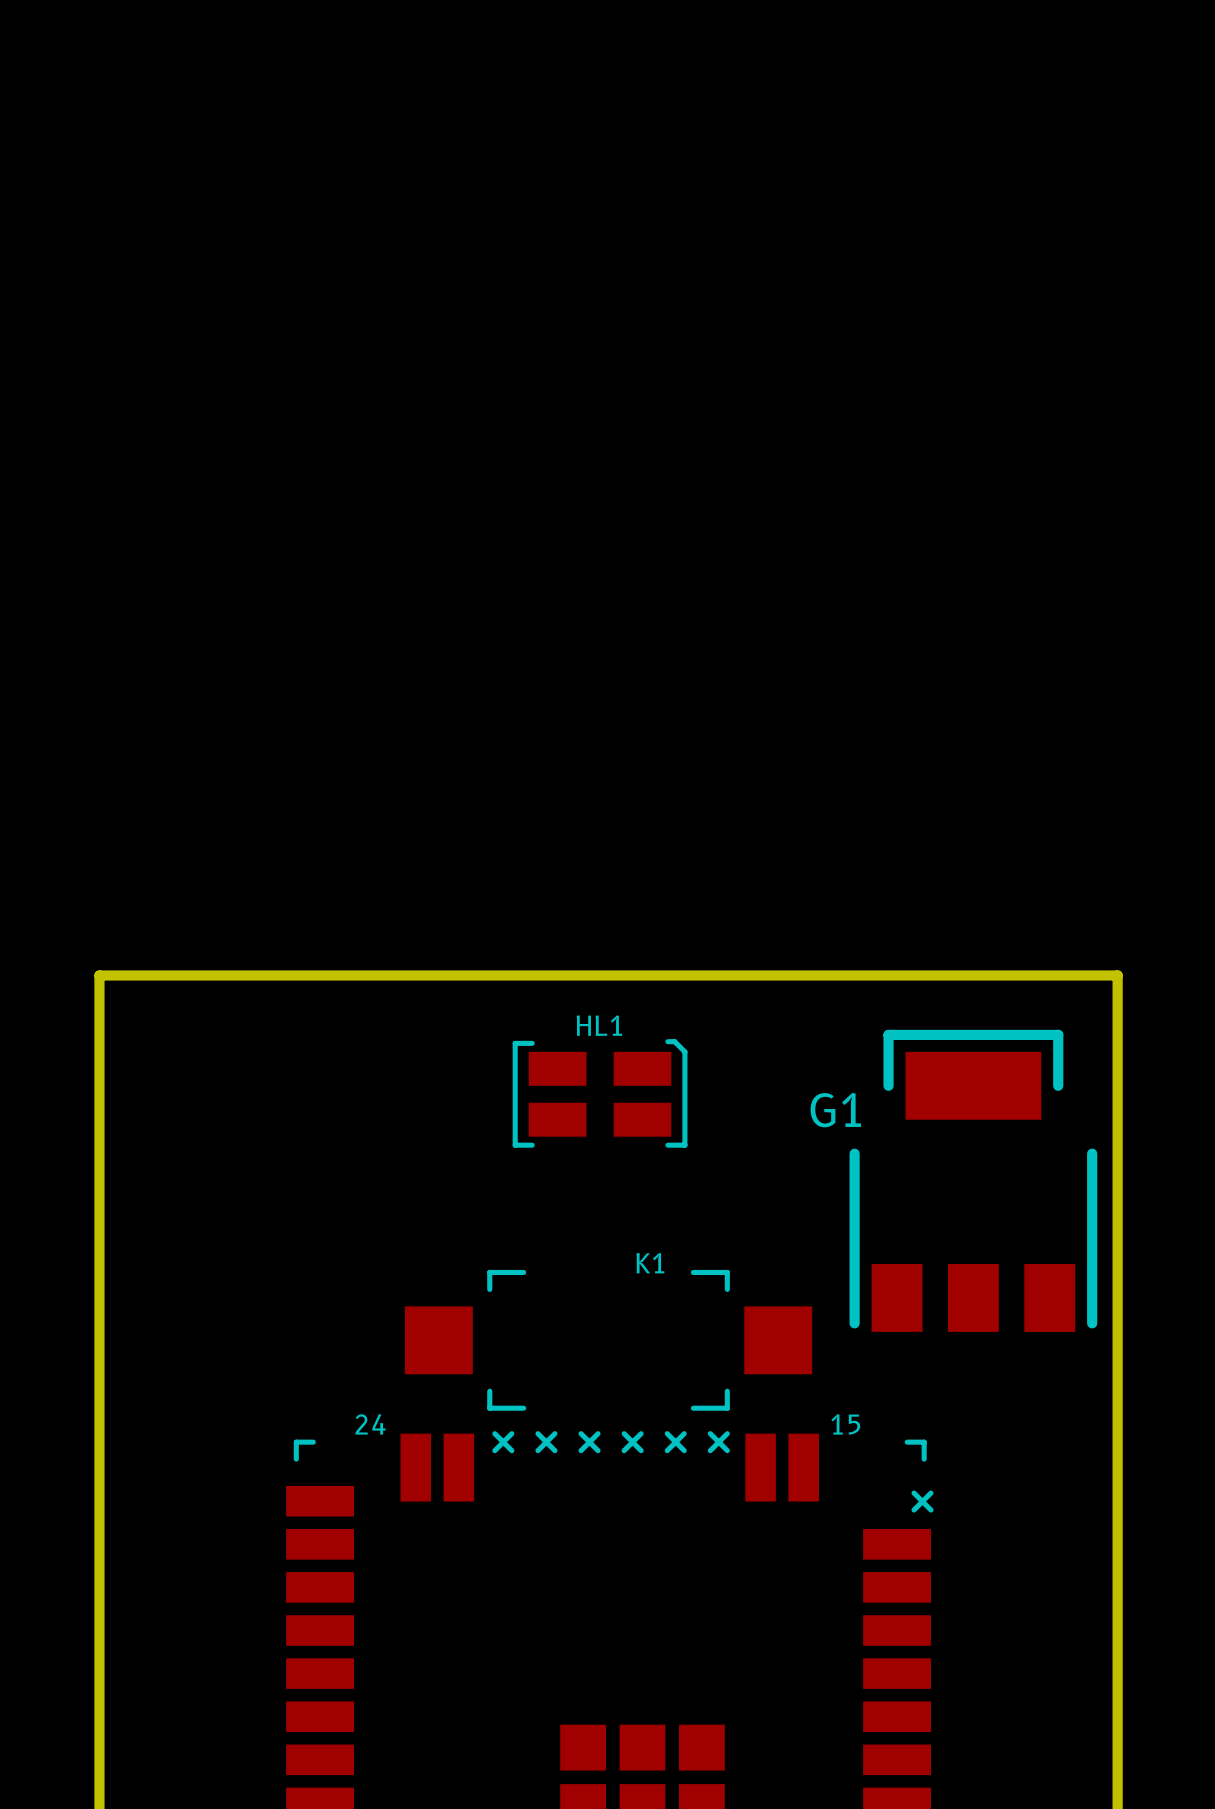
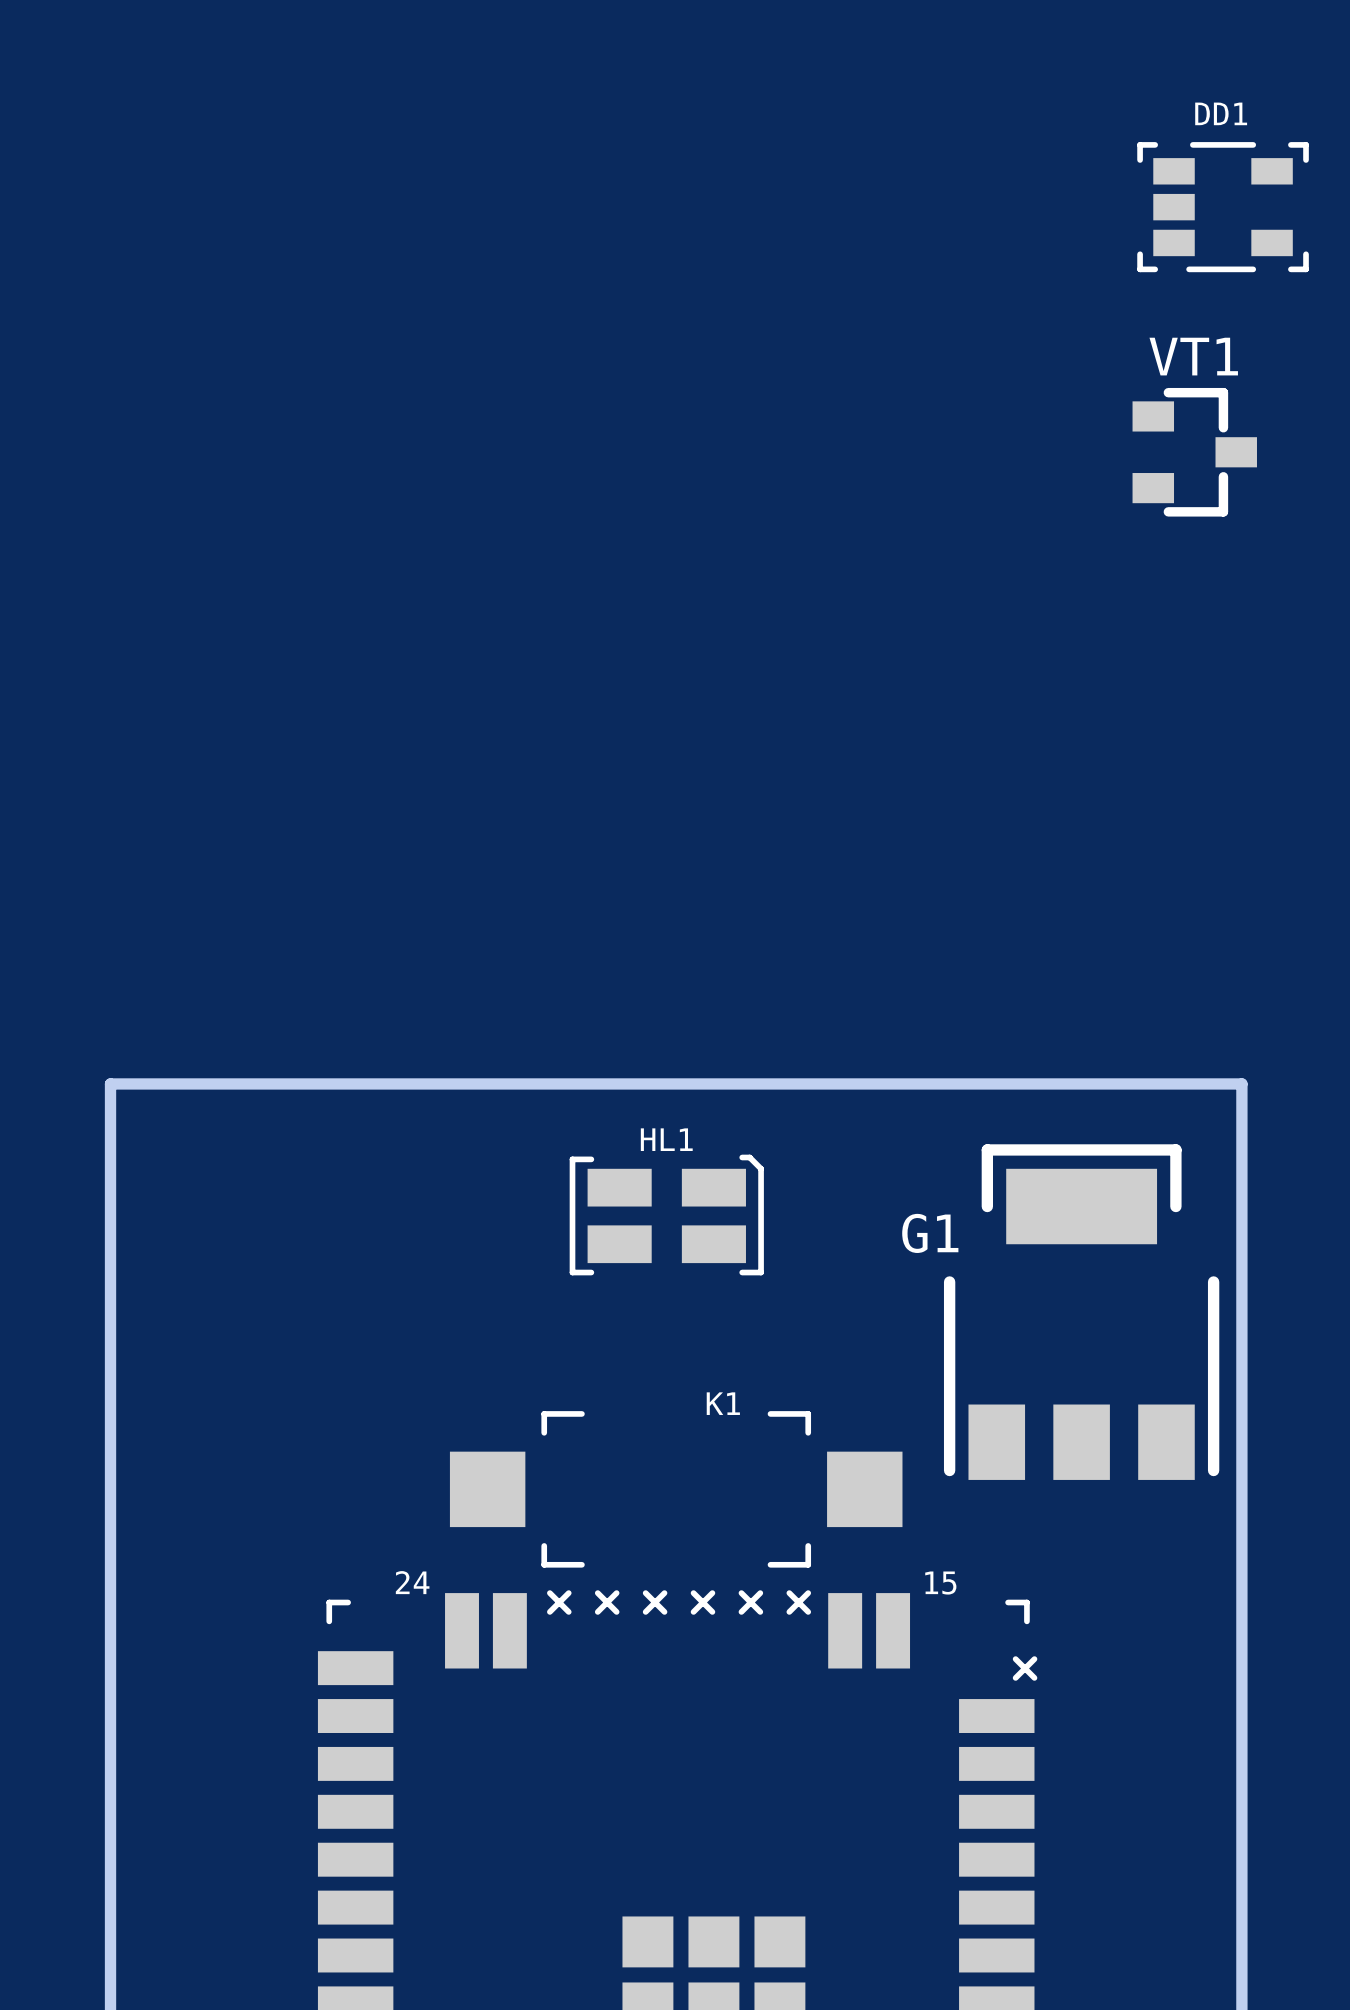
DD1: none -> (1223, 207)
VT1: none -> (1194, 452)

